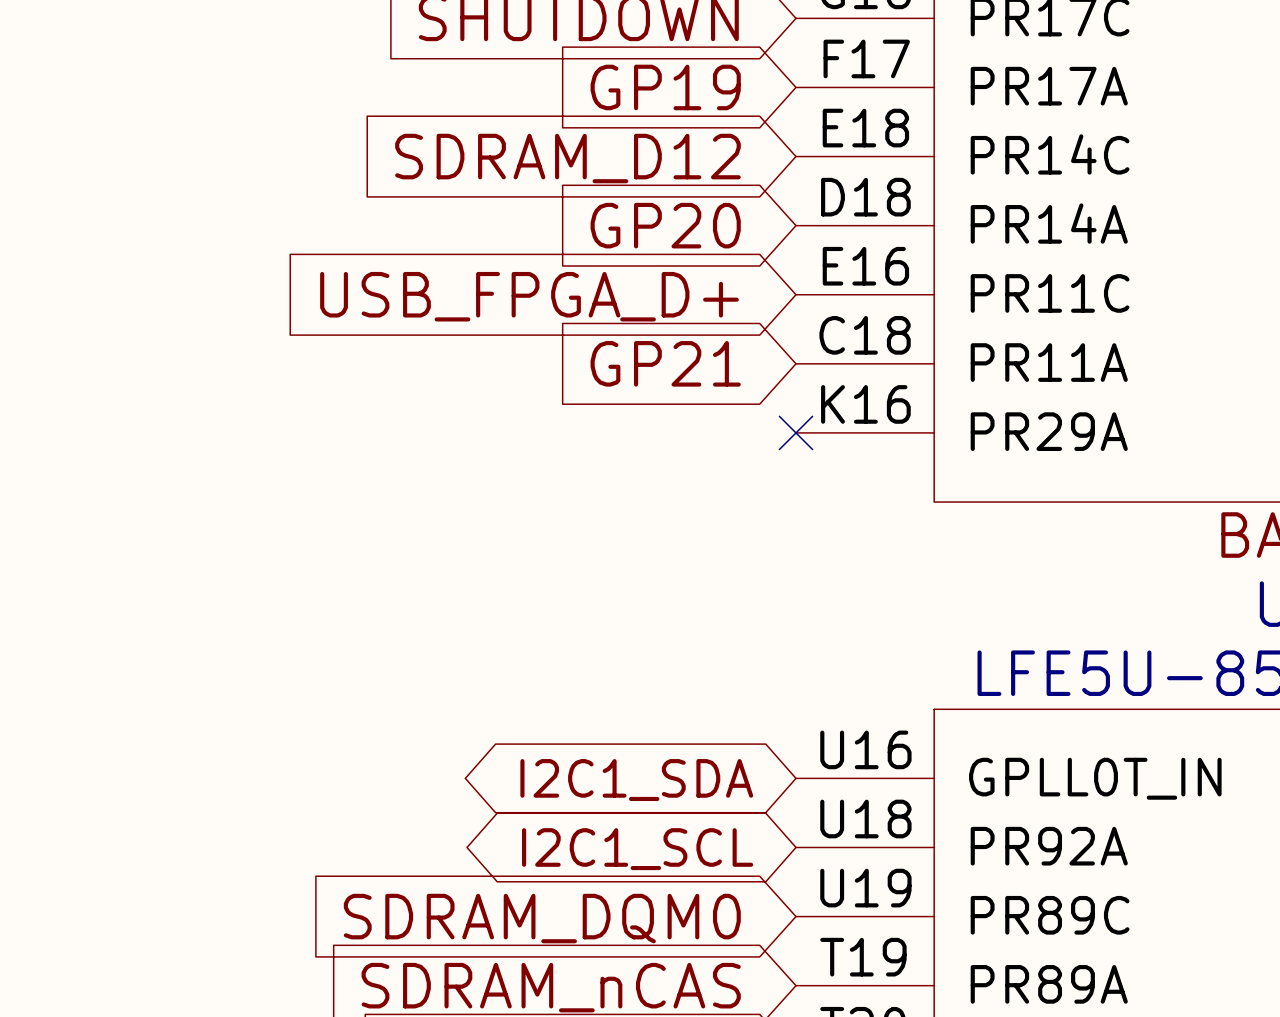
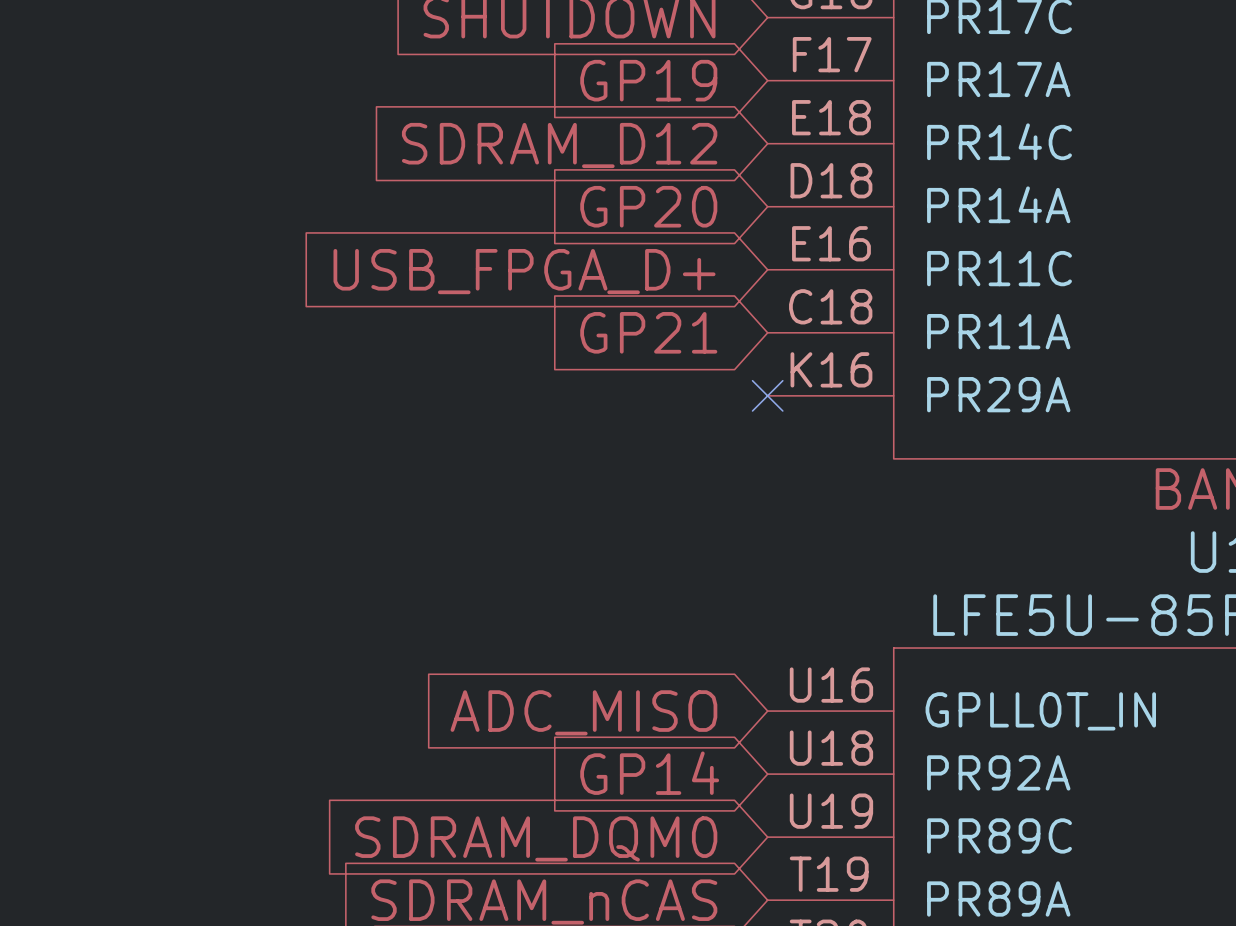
global label shape: bidirectional (636, 780) -> input (583, 712)
global label: I2C1_SDA (636, 780) -> ADC_MISO (583, 712)
global label shape: bidirectional (637, 849) -> input (649, 773)
global label: I2C1_SCL (637, 849) -> GP14 (649, 773)

